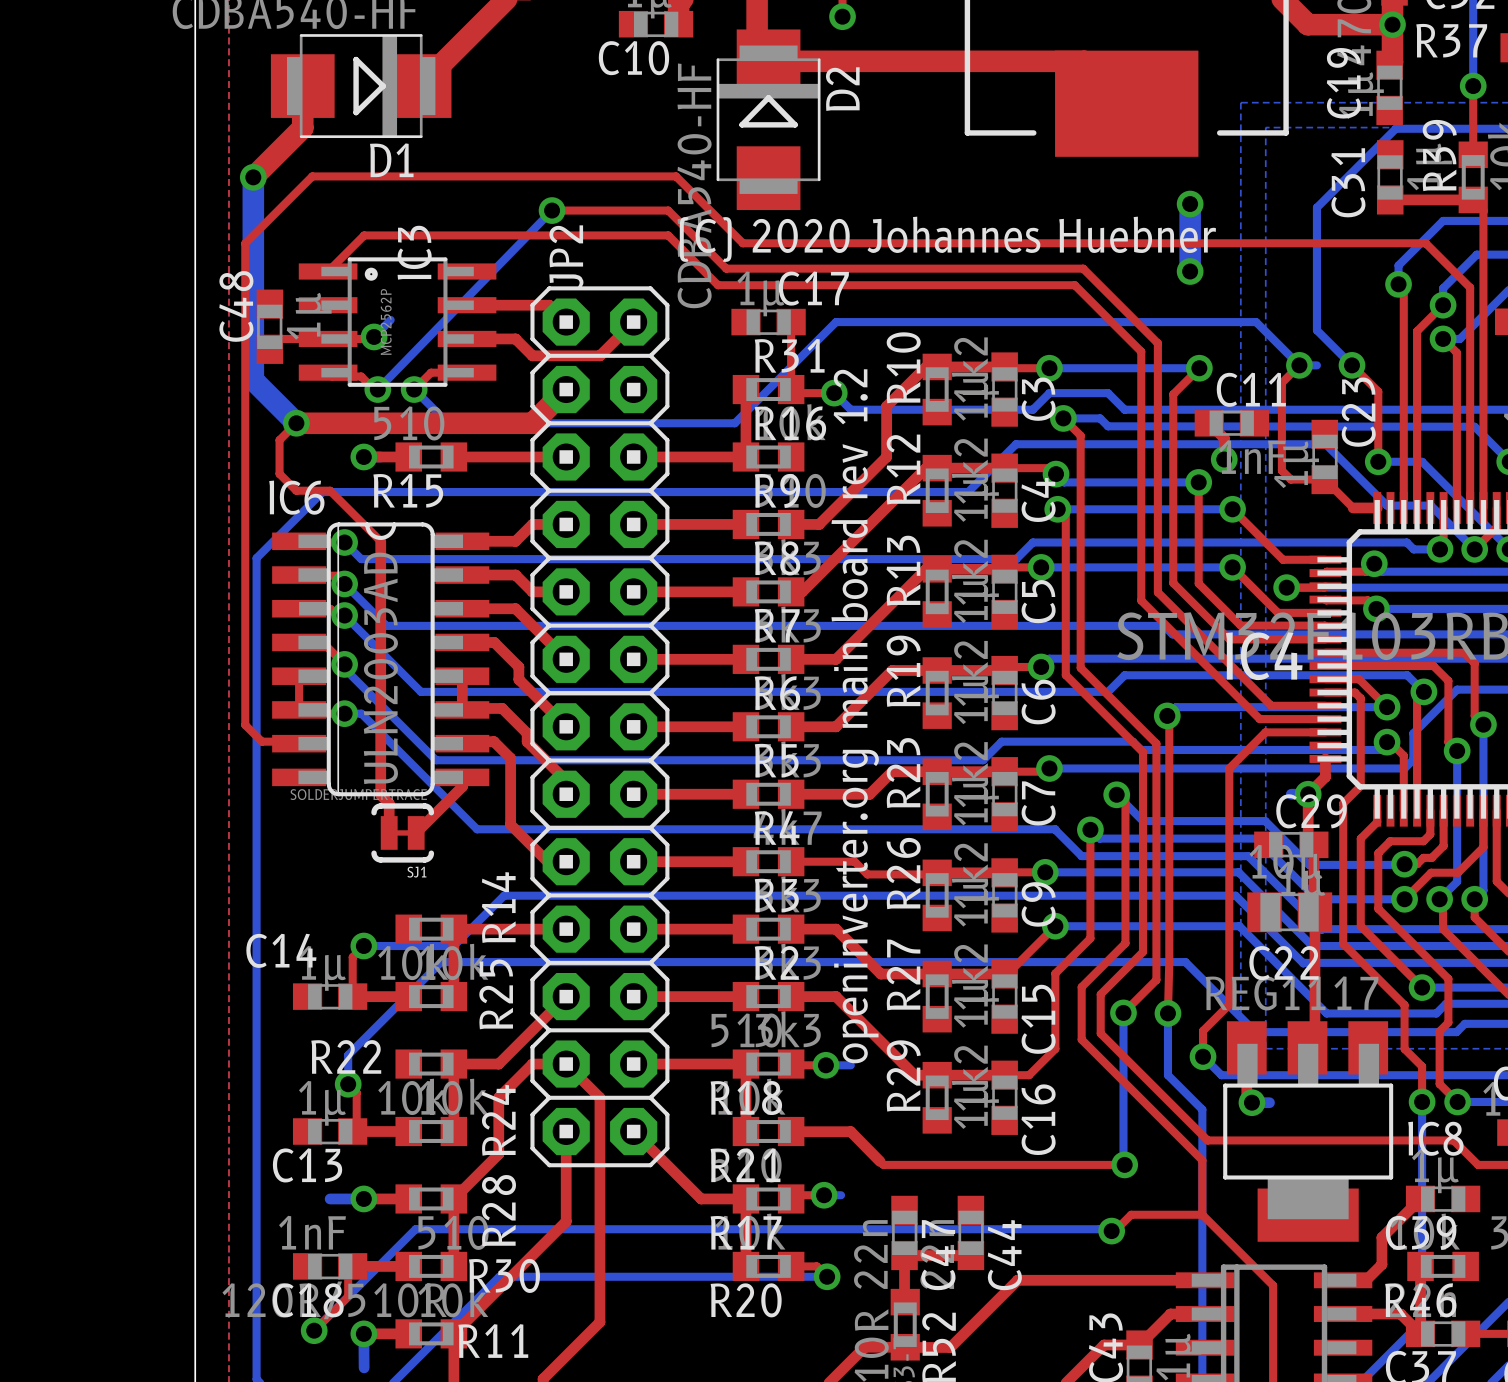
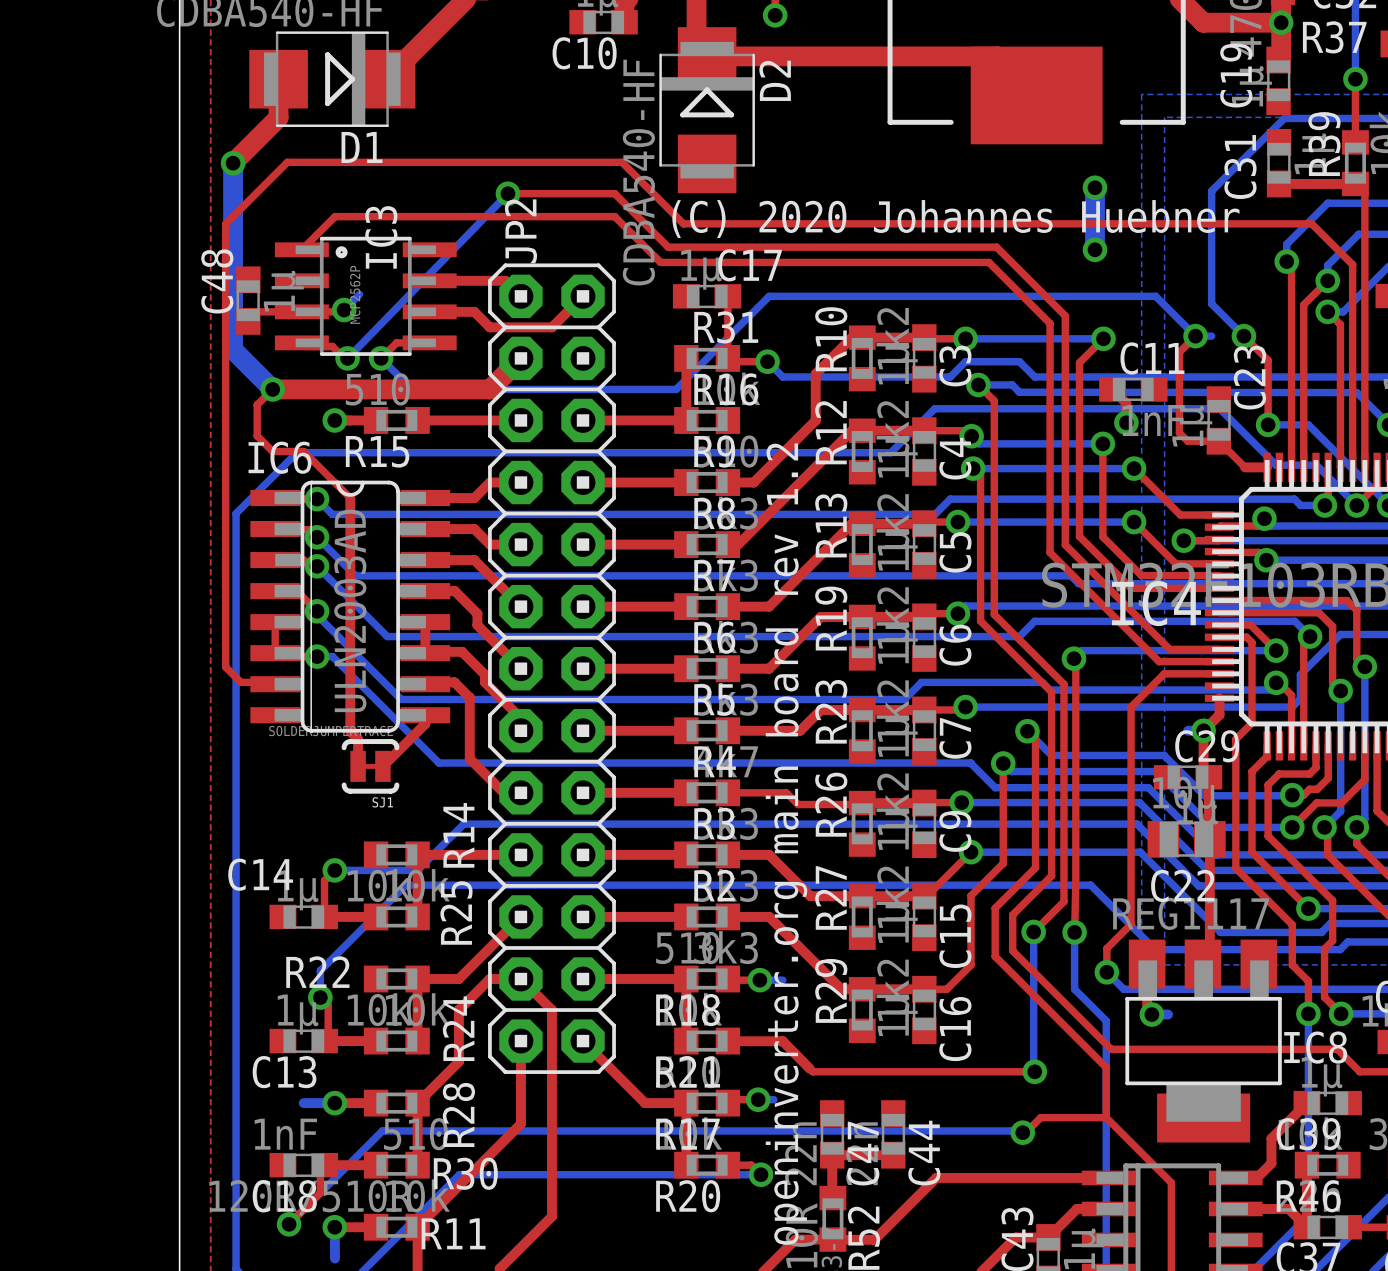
text position: (C) 2020 Johannes Huebner (947, 239) -> (C) 2020 Johannes Huebner (955, 219)
text position: openinverter.org main board rev 1.2 (855, 716) -> openinverter.org main board rev 1.2 (786, 844)

